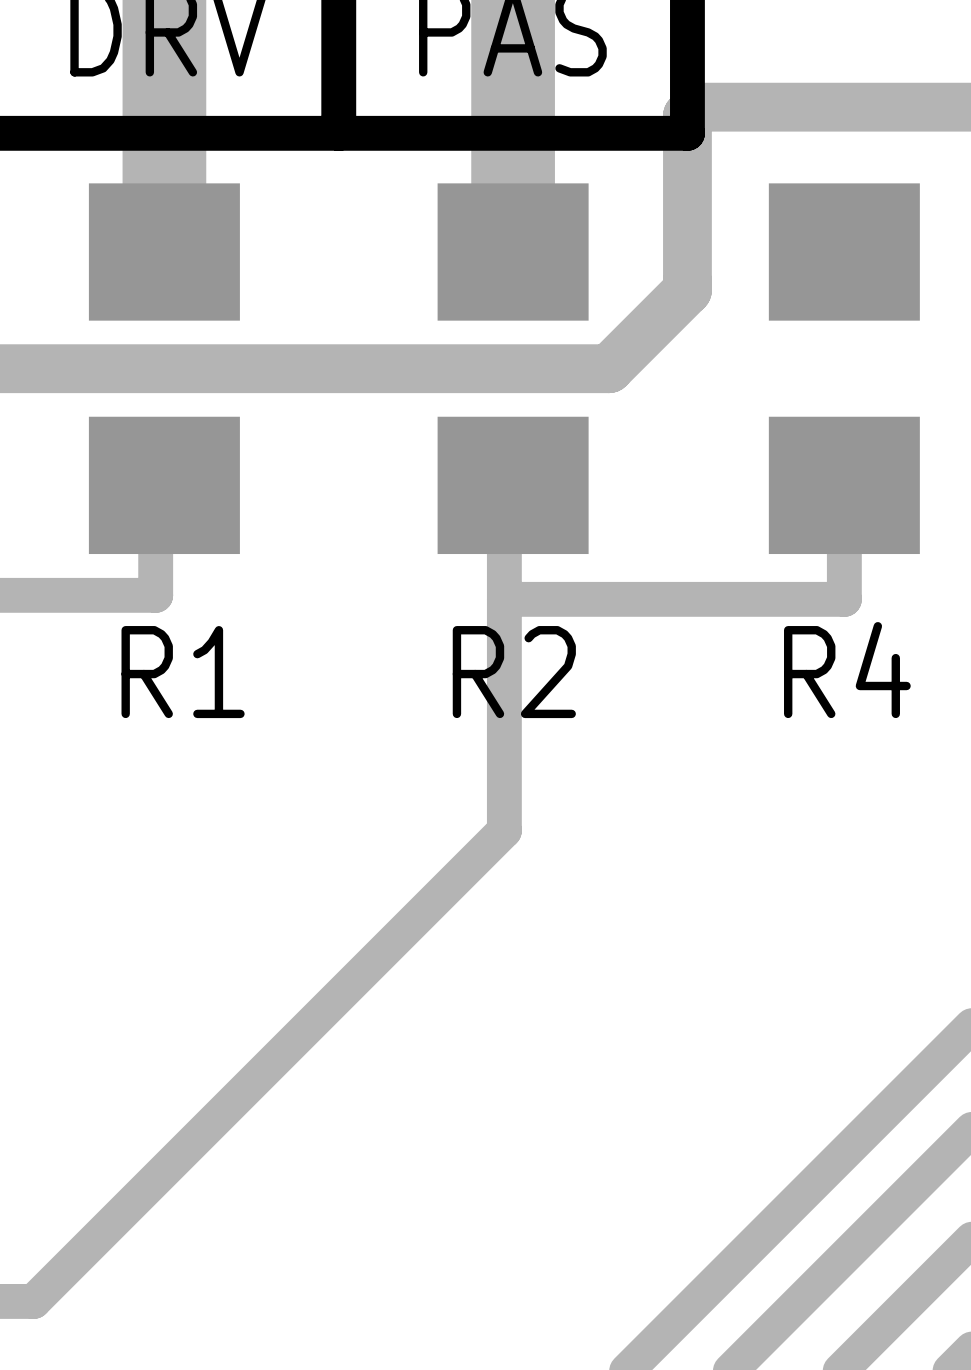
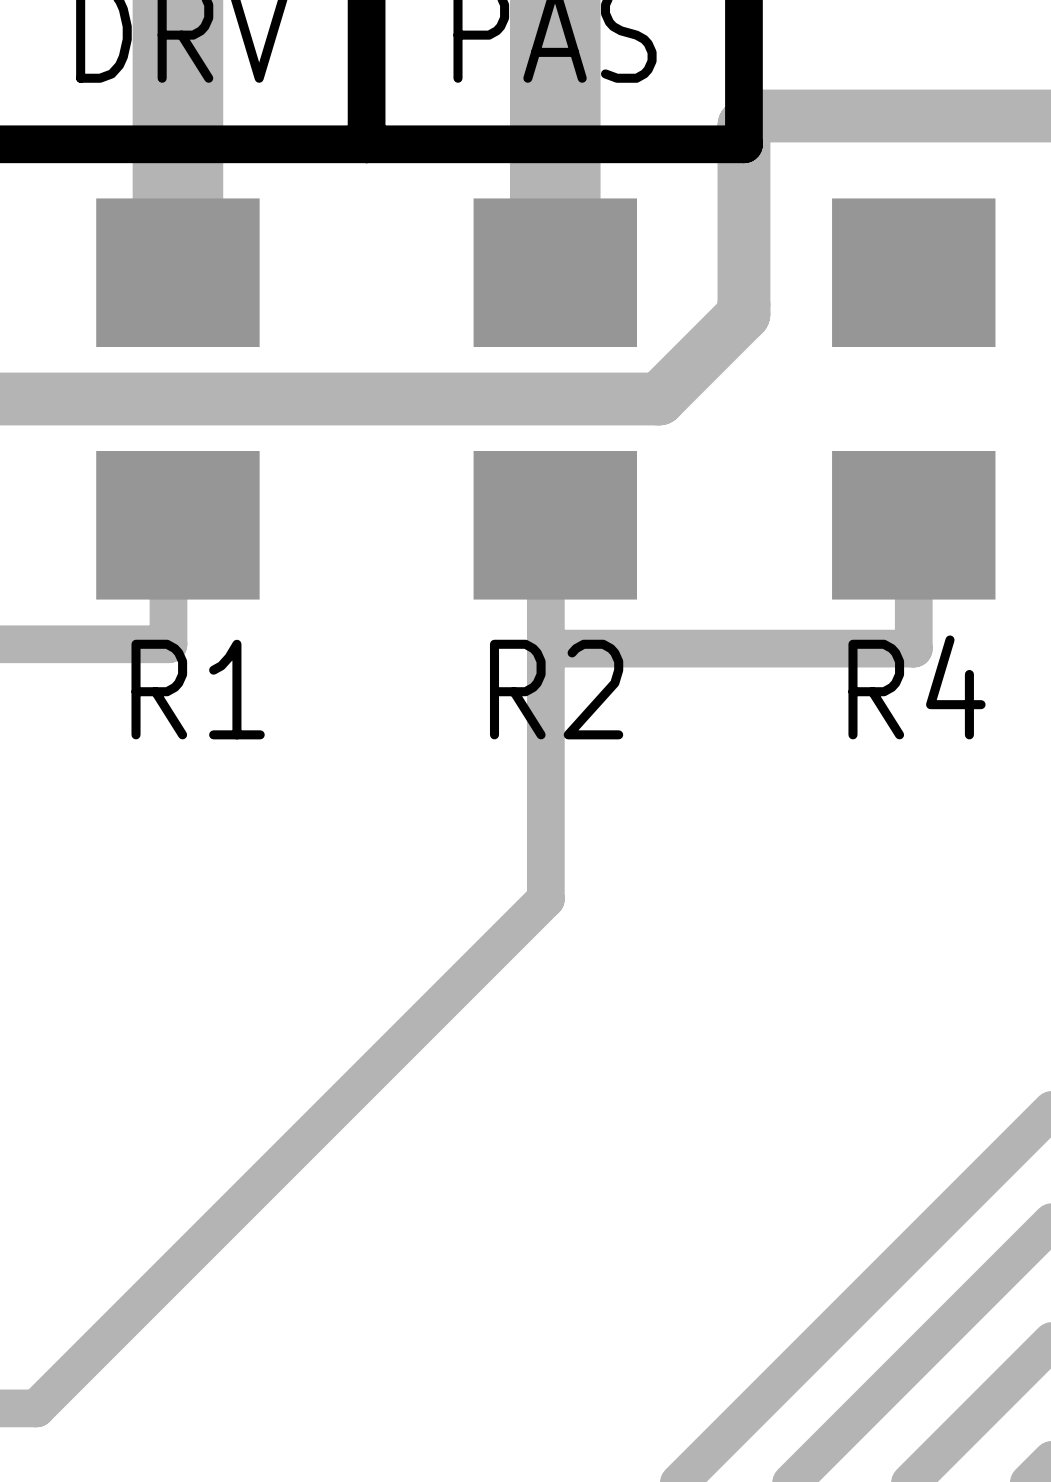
R4 name position: R4 (847, 670) -> R4 (917, 687)
R1 name position: R1 (183, 672) -> R1 (198, 689)
R2 name position: R2 (514, 672) -> R2 (556, 689)

